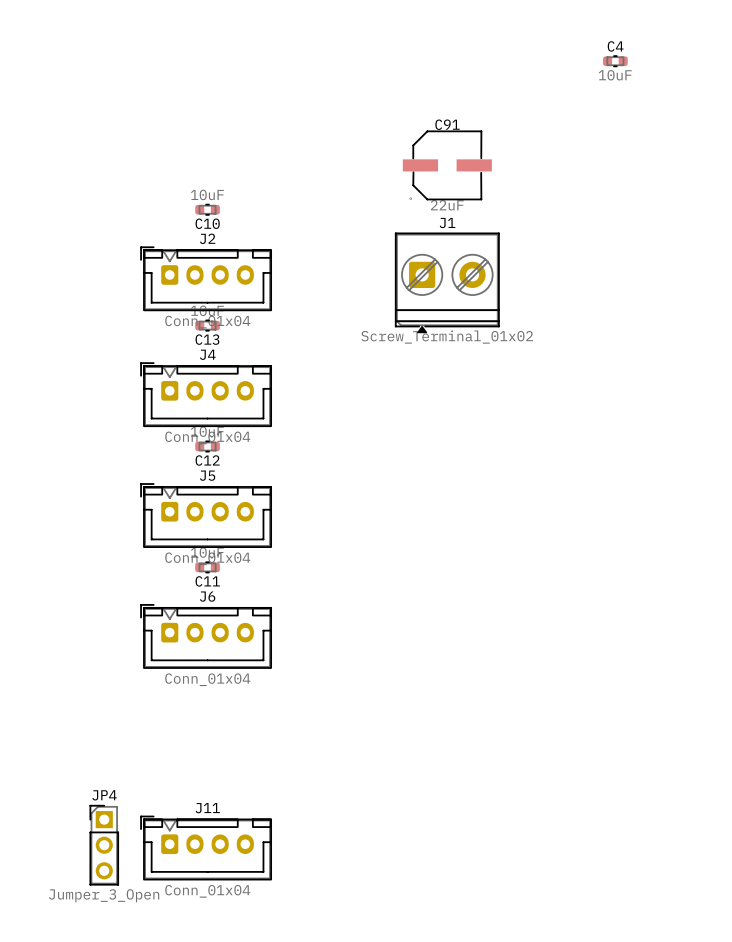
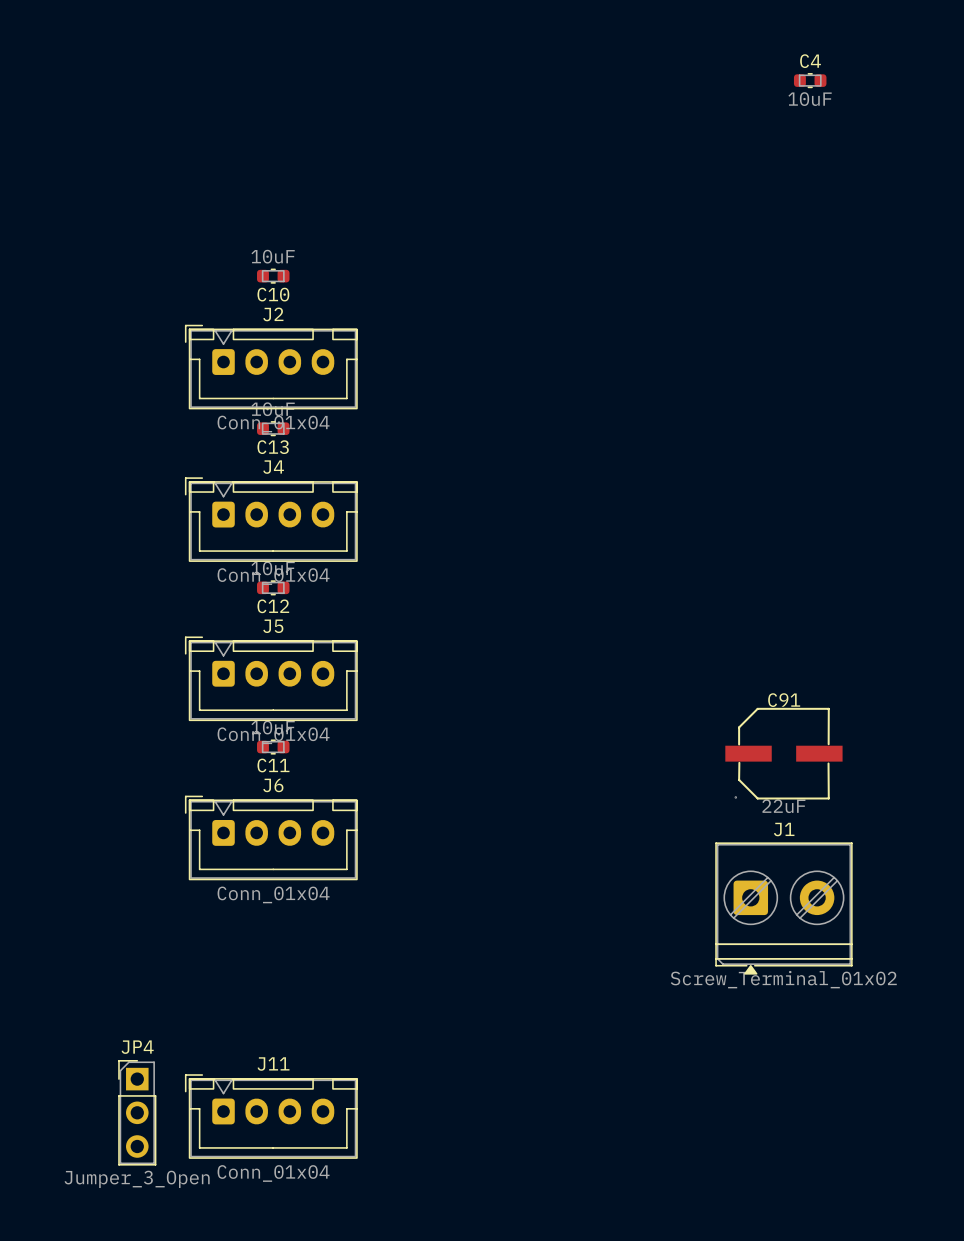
C91 position: (447, 165) -> (783, 753)
J1 position: (447, 283) -> (783, 908)

